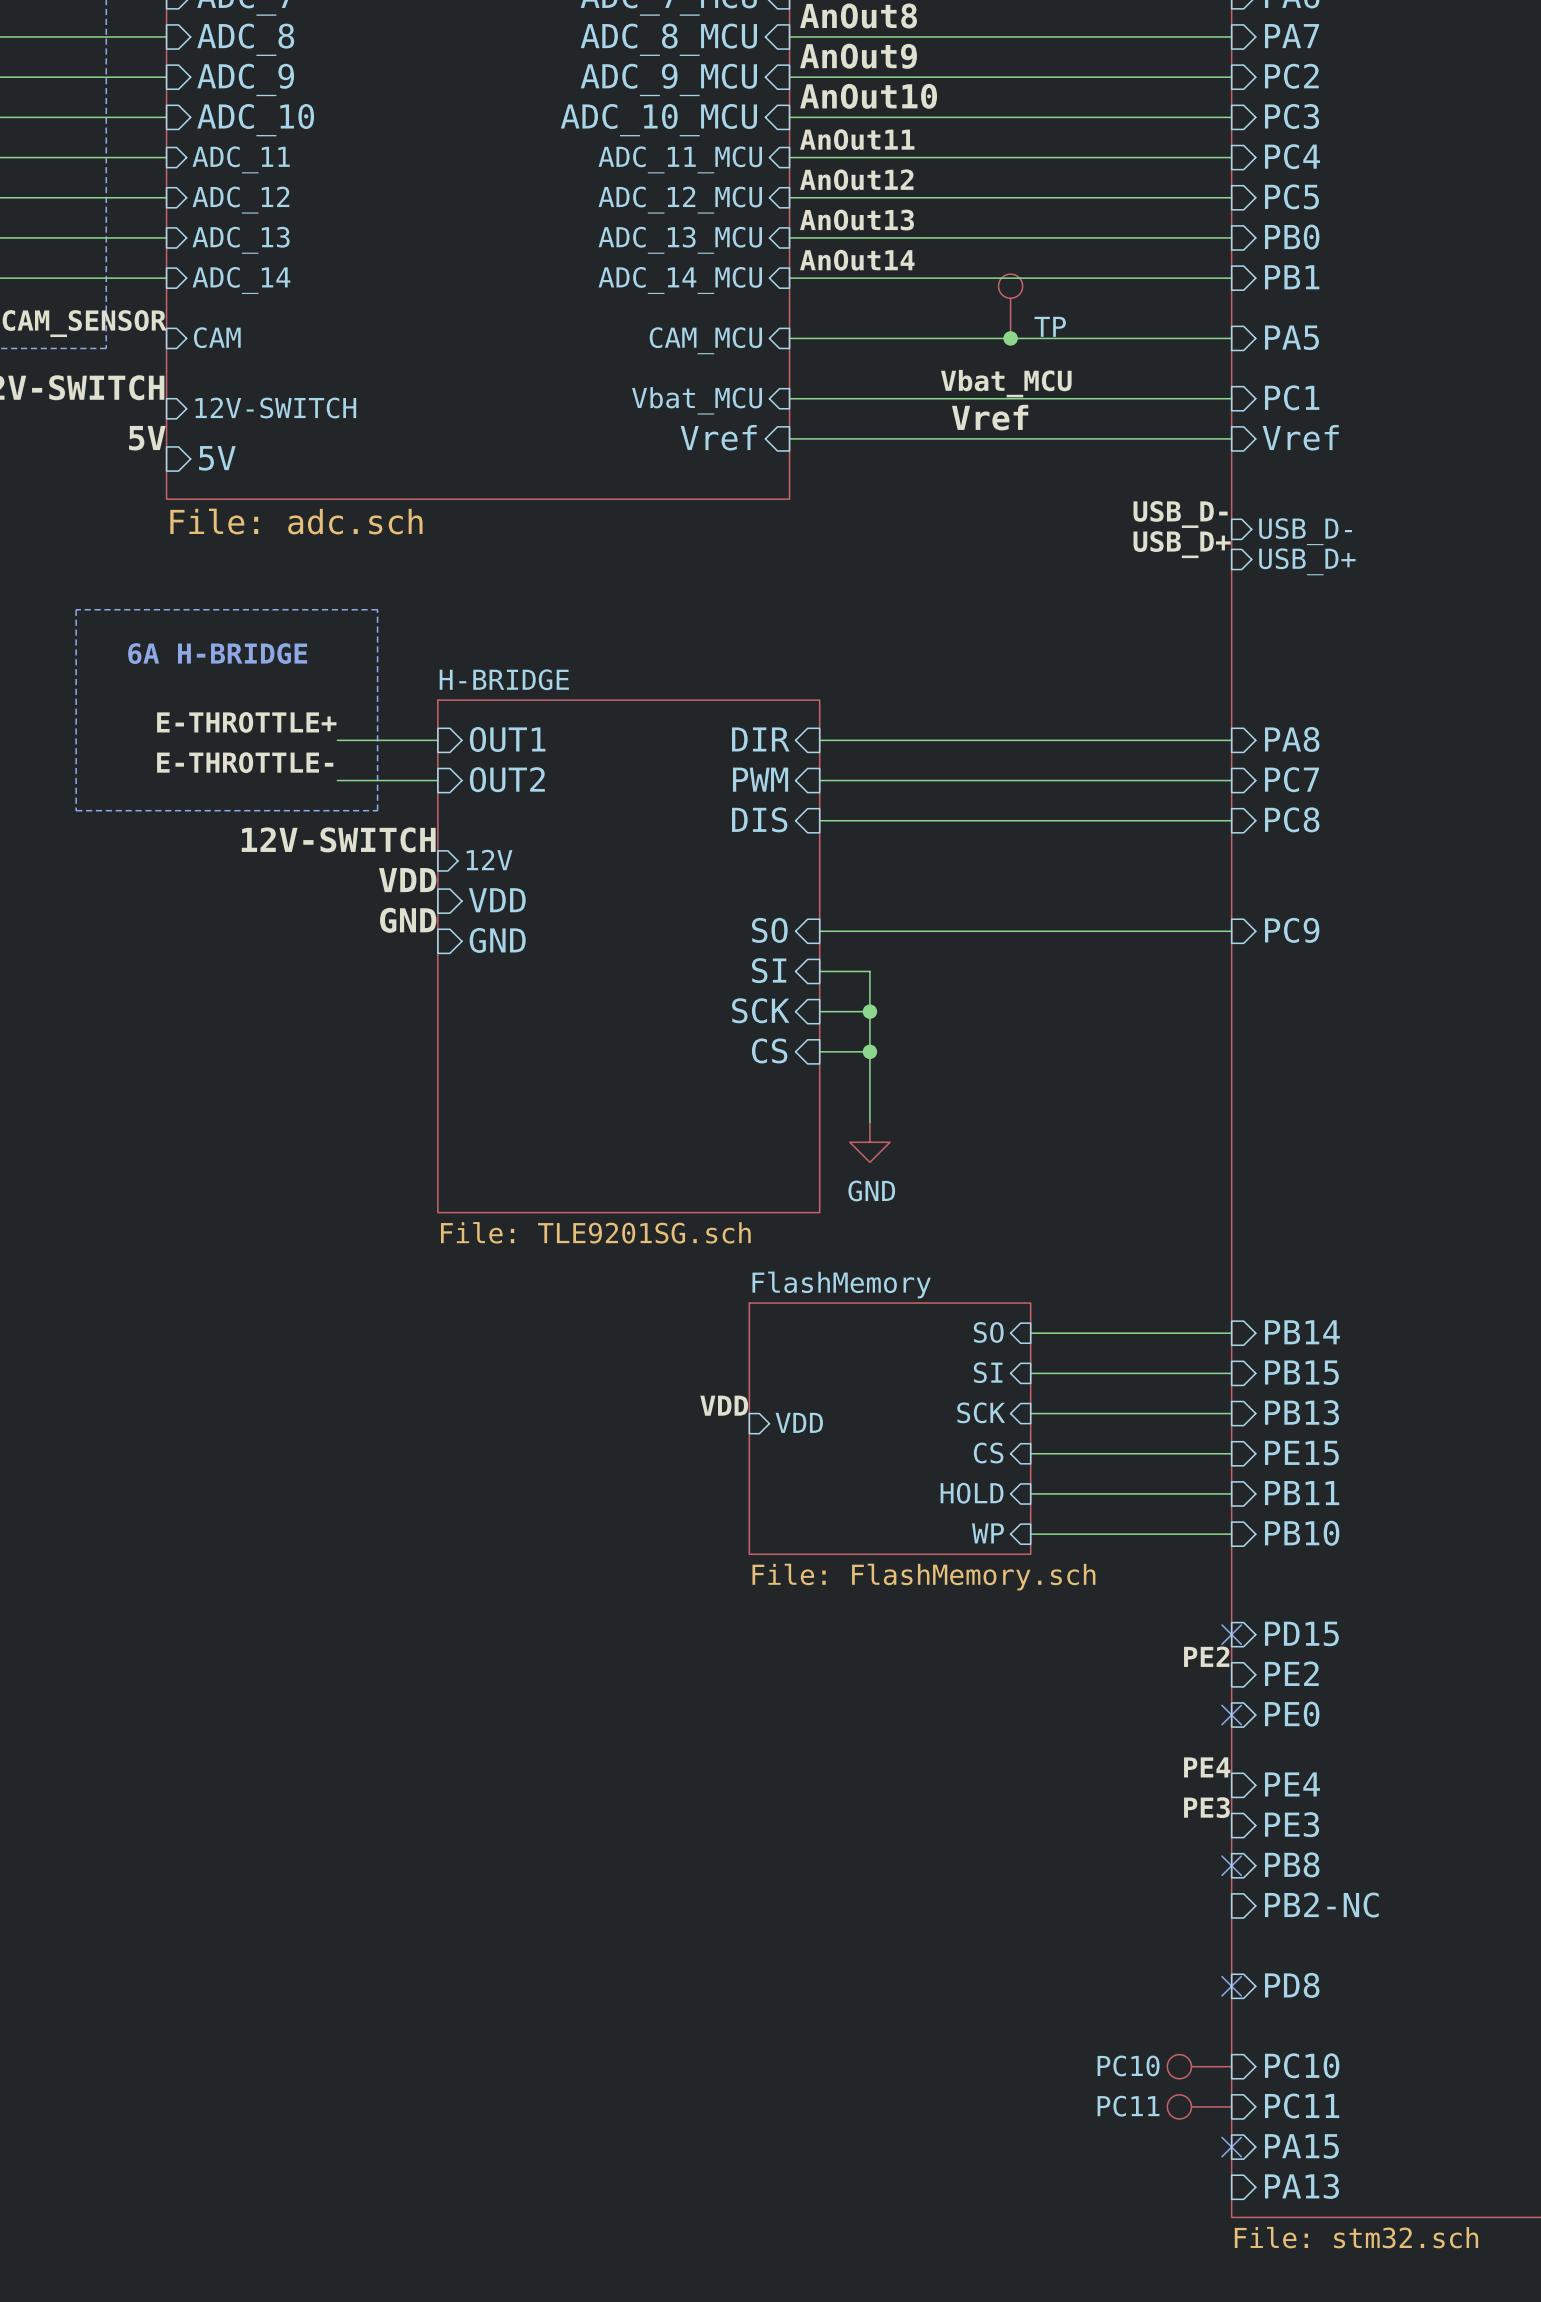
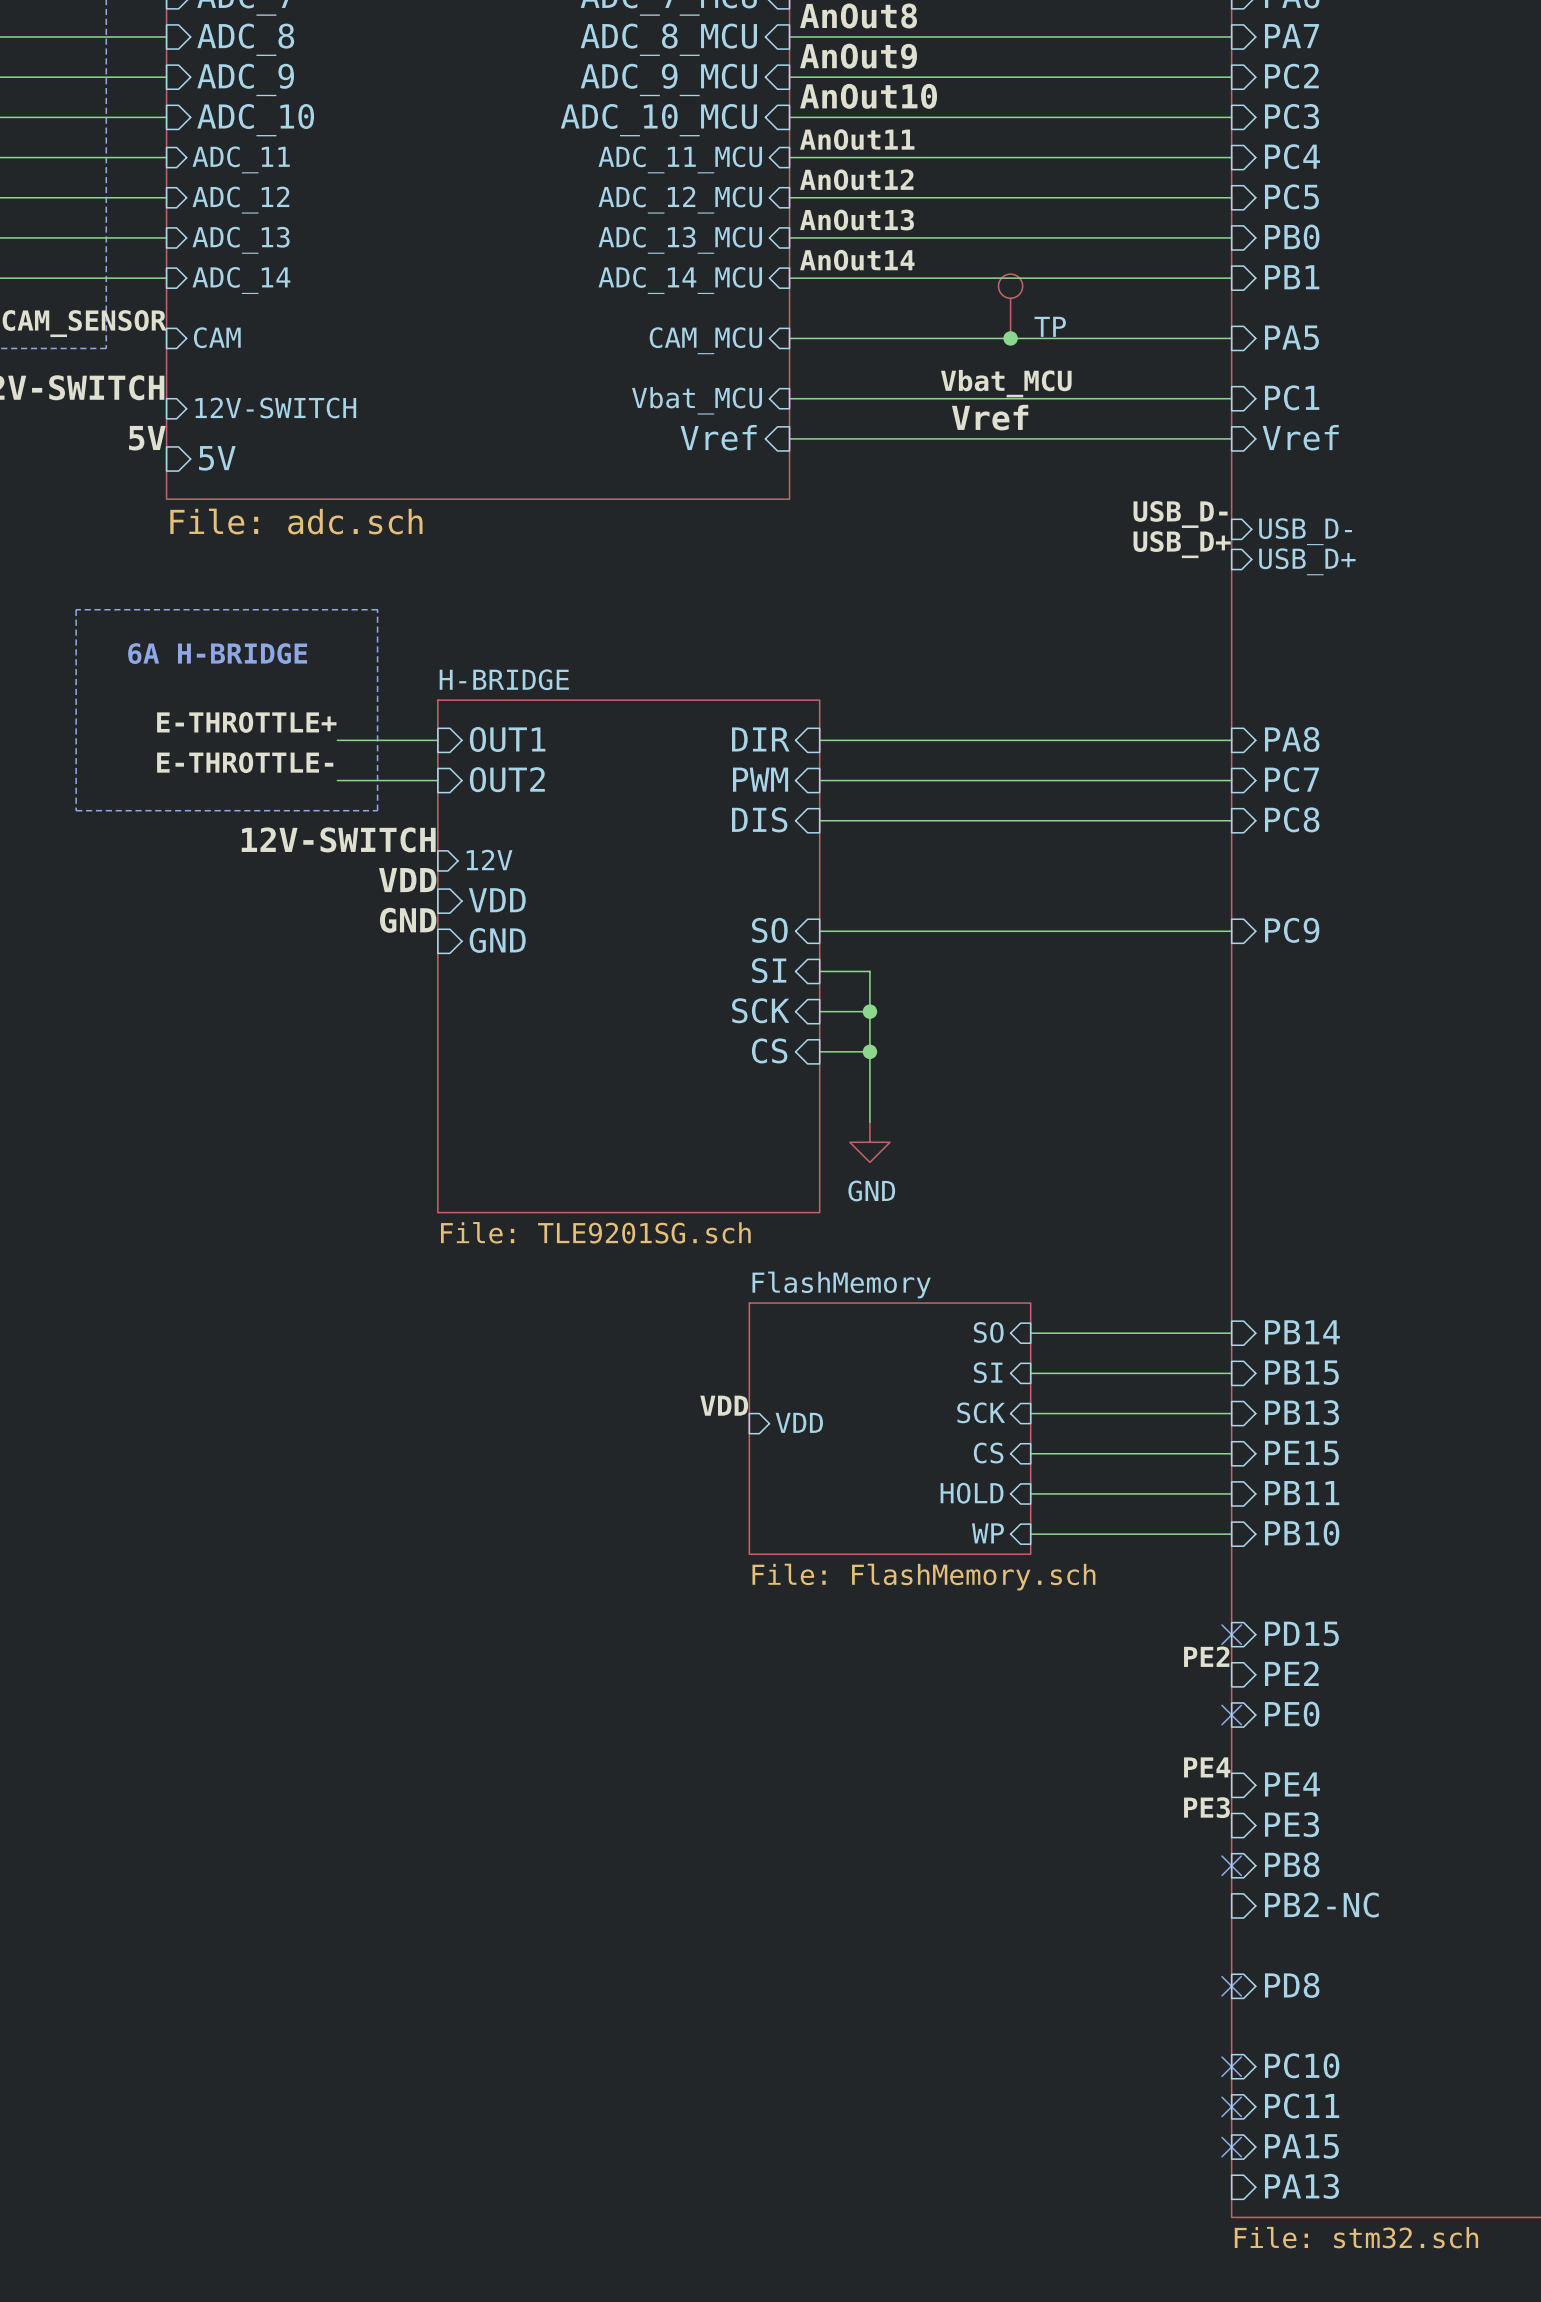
PC10: (1199, 2066) -> none
no-connect mark: none -> (1231, 2066)
PC11: (1199, 2106) -> none
no-connect mark: none -> (1231, 2106)

